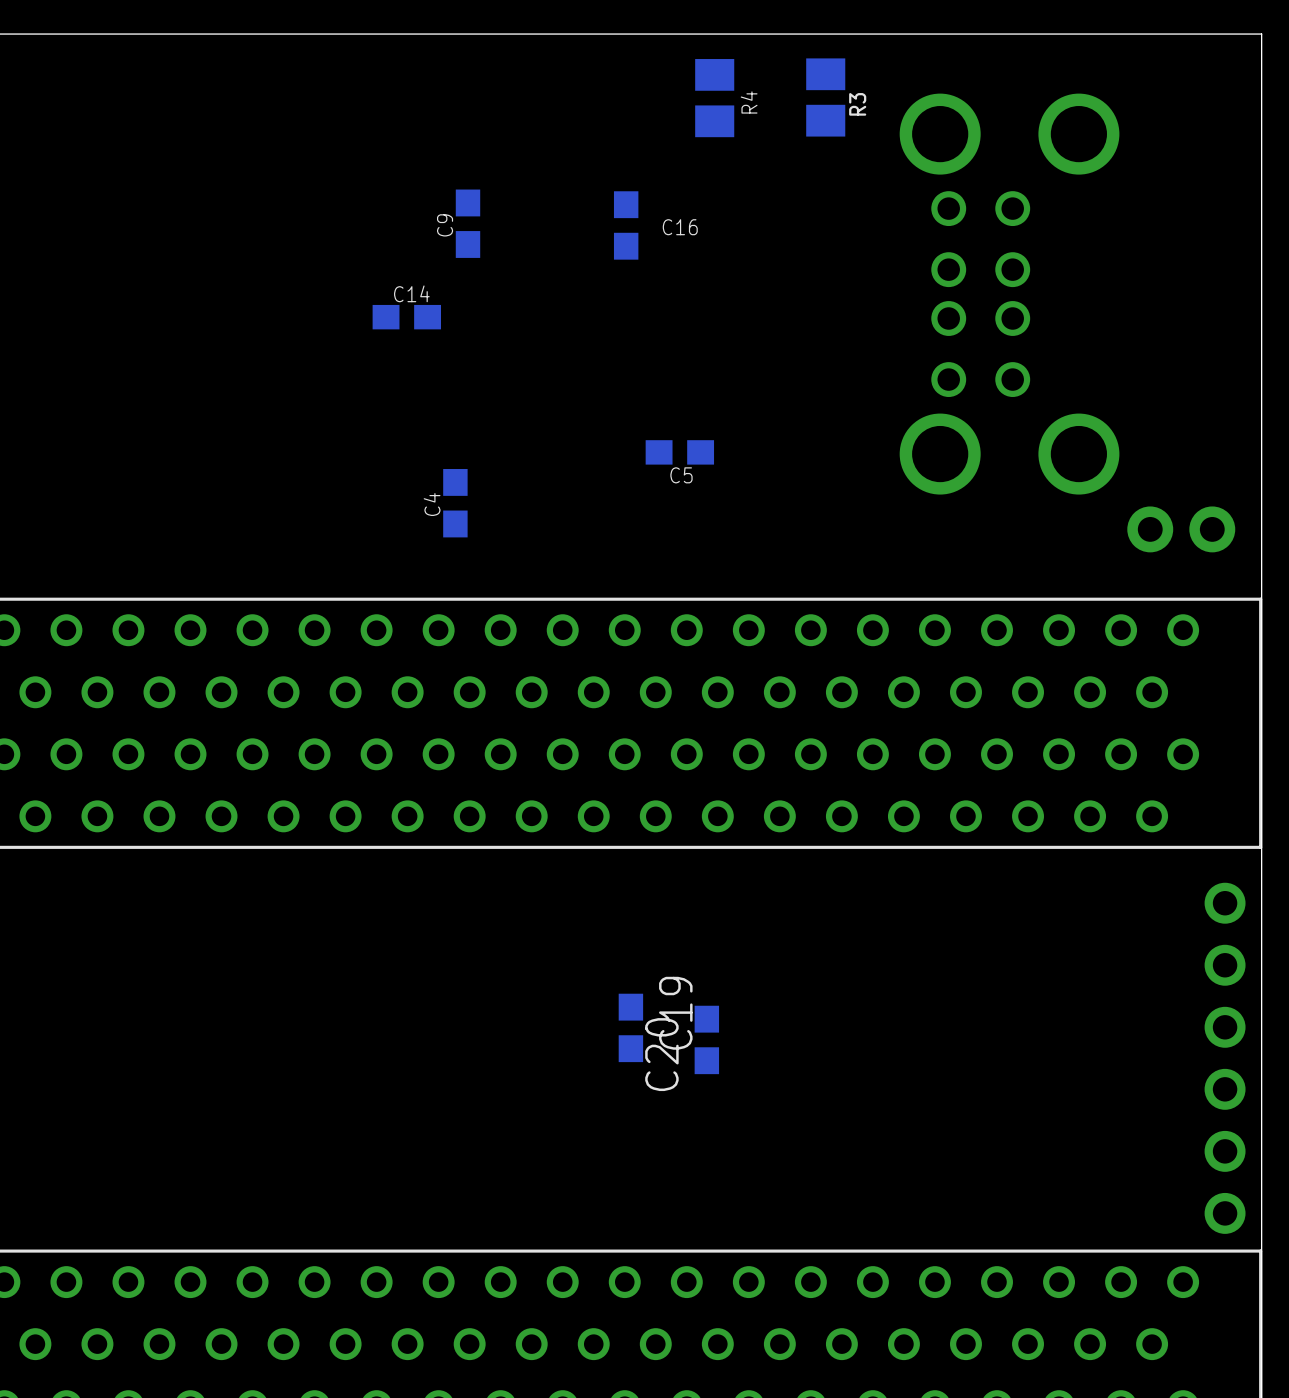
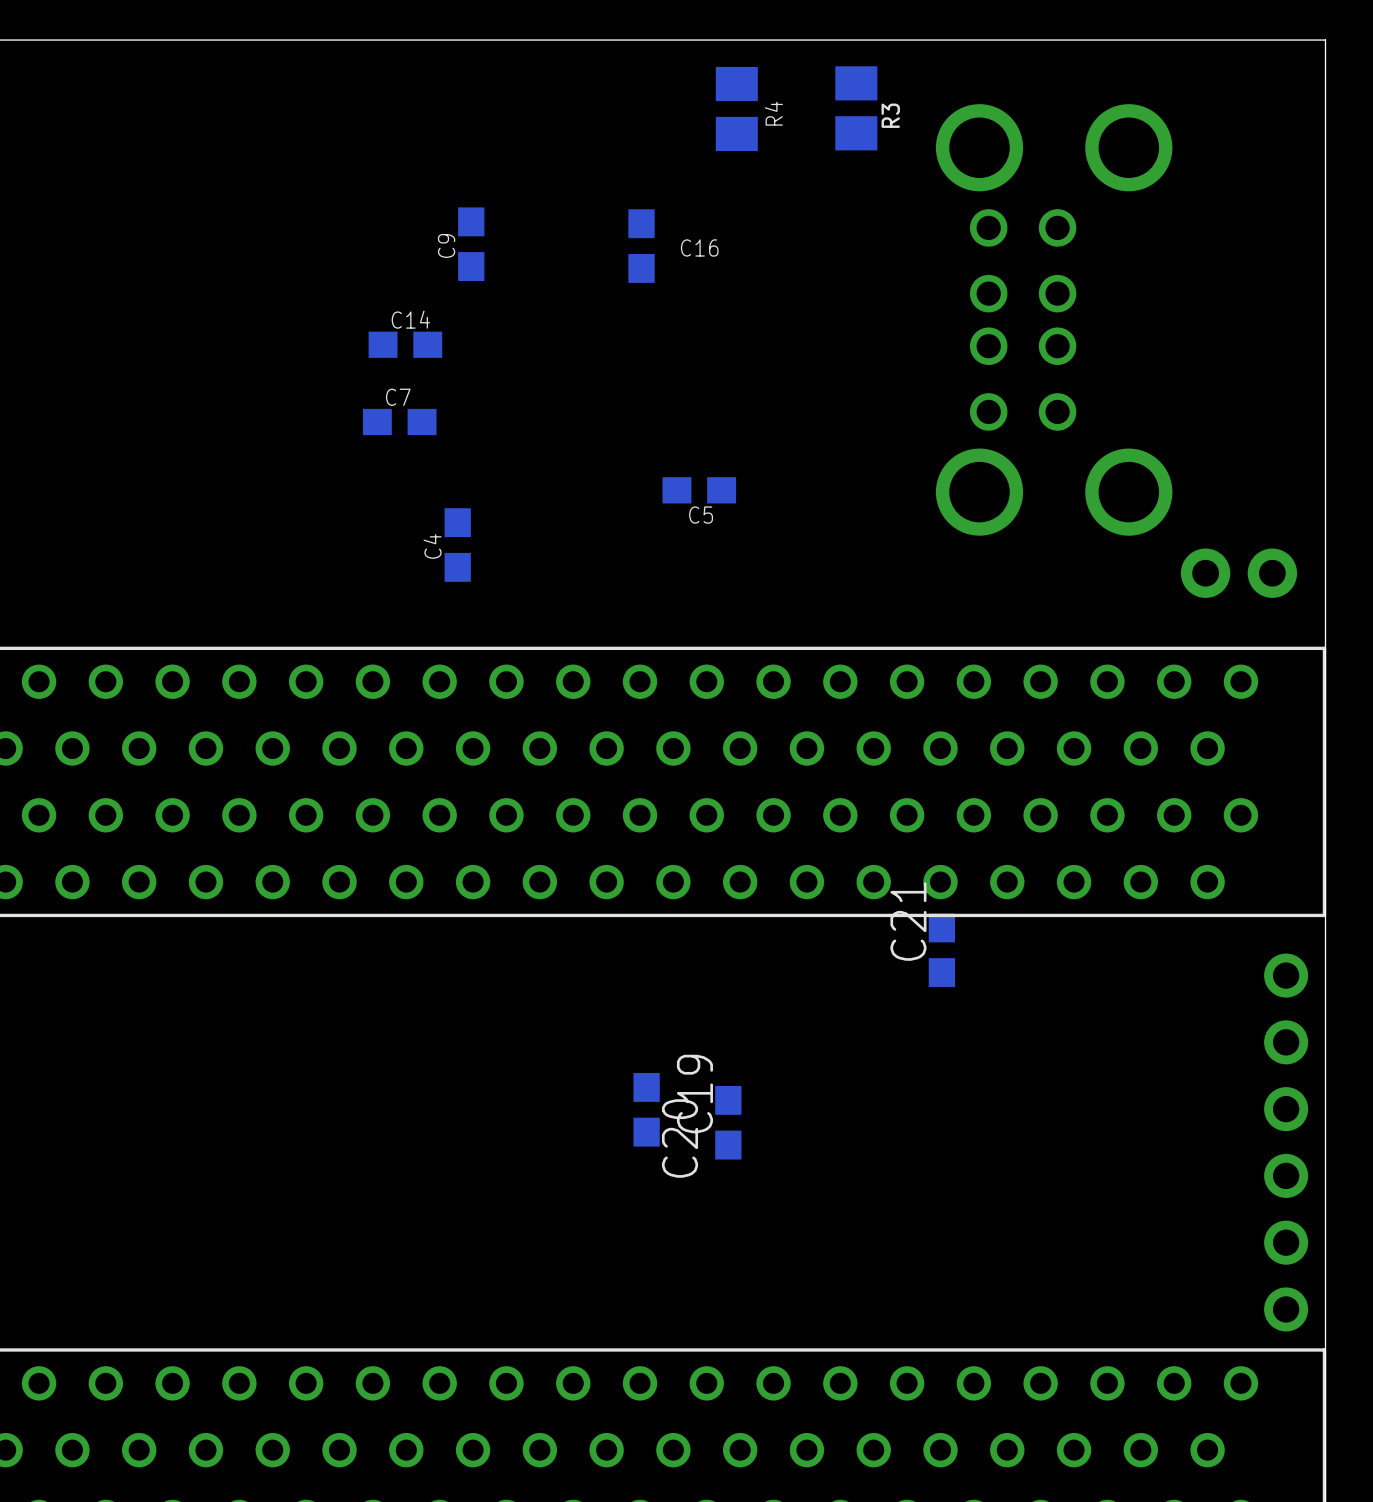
C7: none -> (399, 421)
C21: none -> (941, 950)

